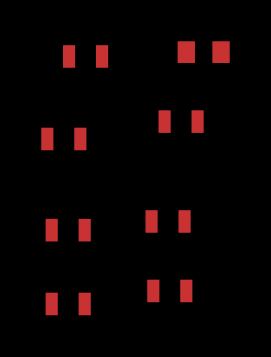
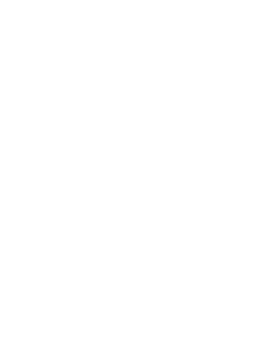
part: (203, 52) -> none
part: (85, 56) -> none
part: (181, 121) -> none
part: (63, 138) -> none
part: (168, 221) -> none
part: (68, 230) -> none
part: (169, 290) -> none
part: (68, 303) -> none

